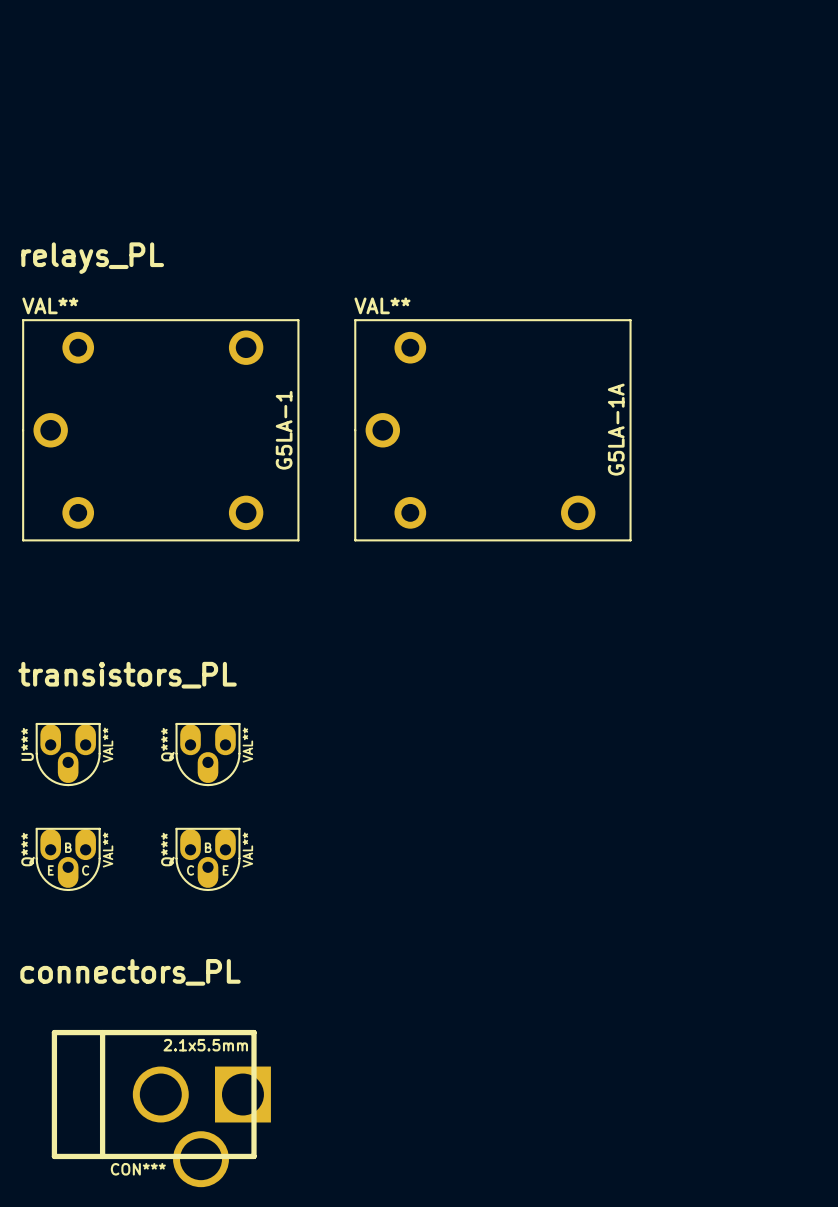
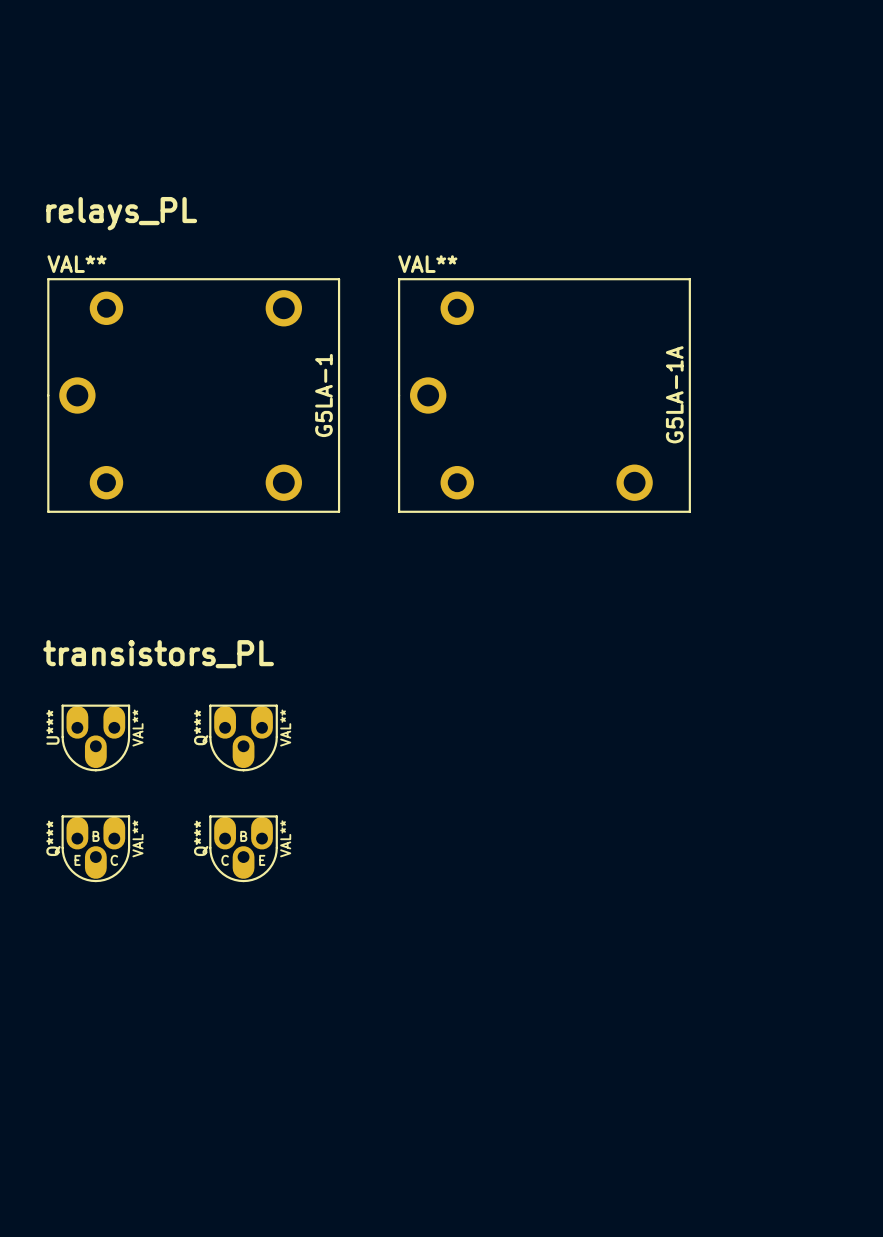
text: connectors_PL (130, 972) -> none
CON***: (161, 1108) -> none

